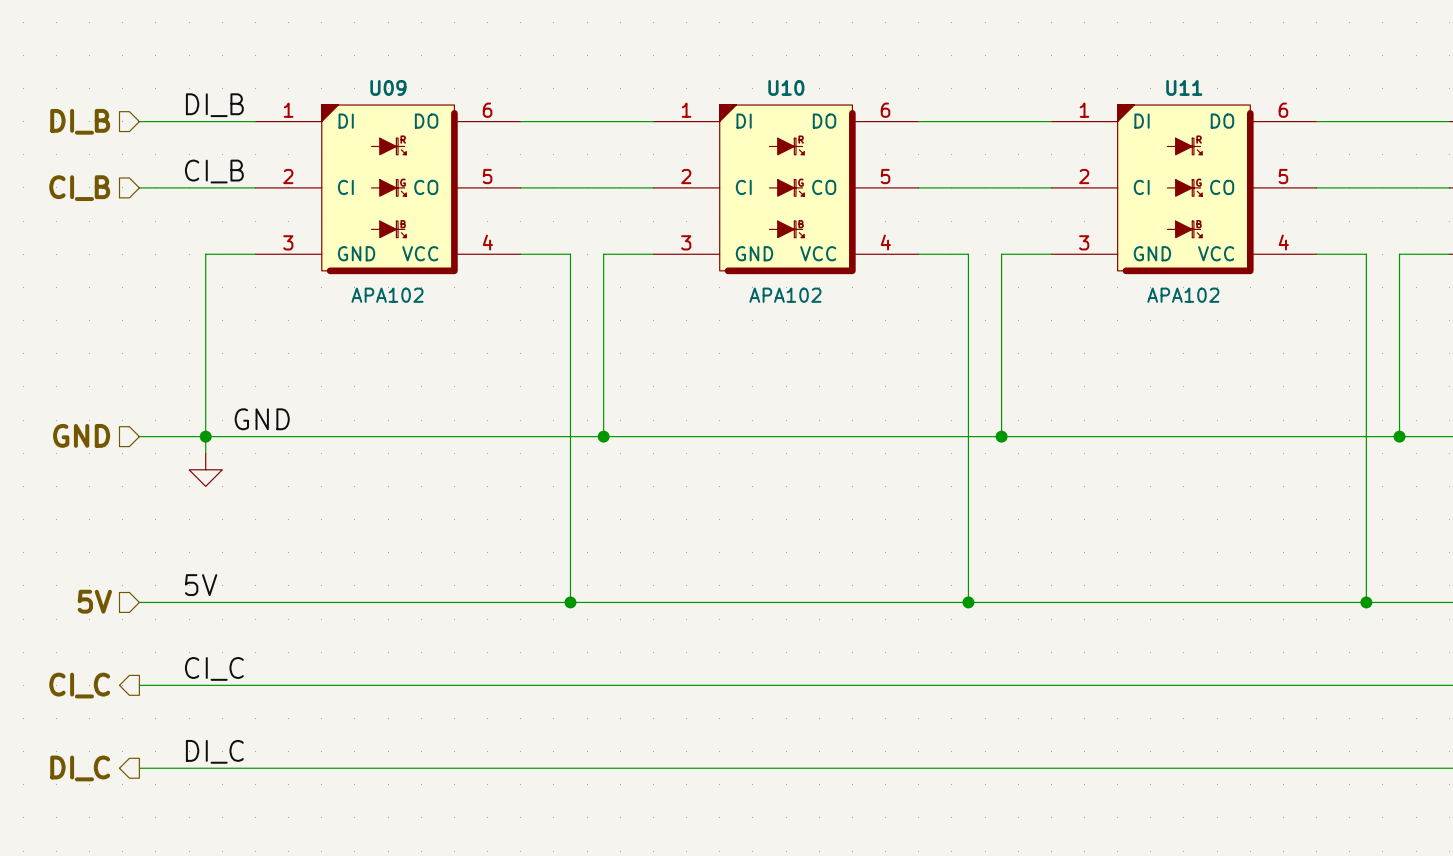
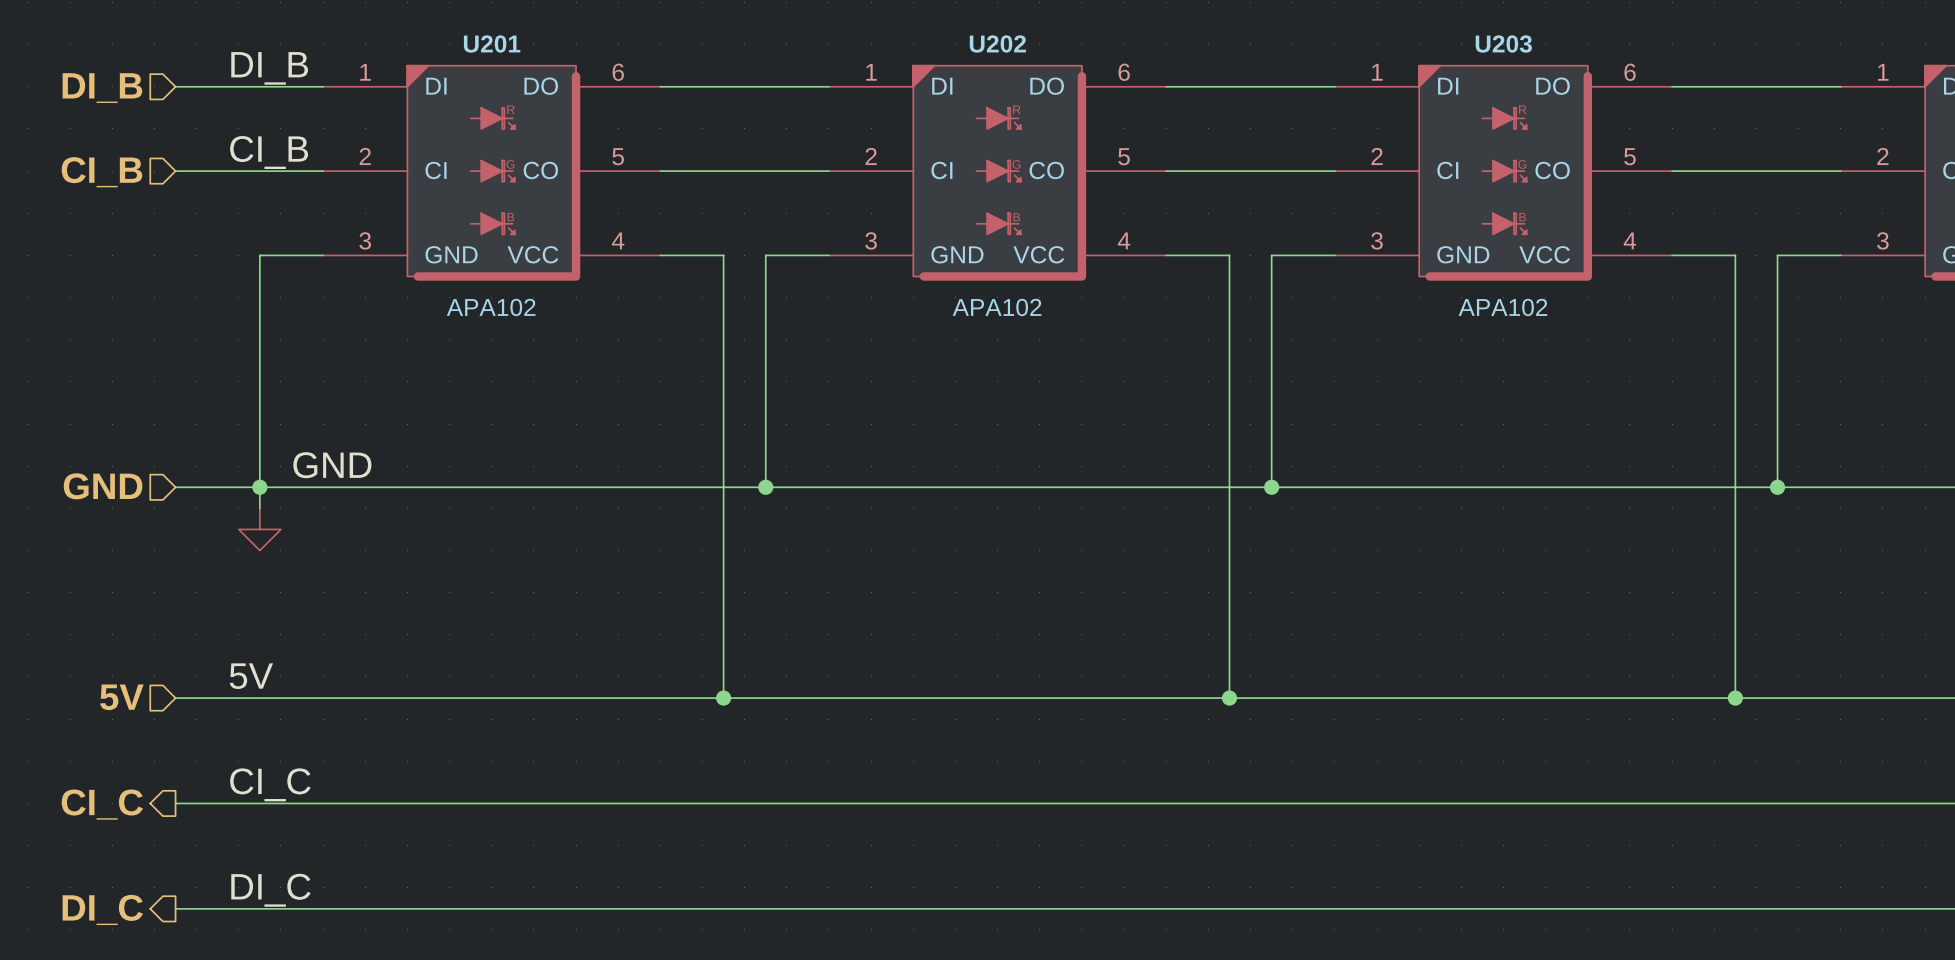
U09 name: U09 (388, 87) -> U201 (492, 43)
U10 name: U10 (786, 87) -> U202 (997, 43)
U11 name: U11 (1184, 87) -> U203 (1503, 44)

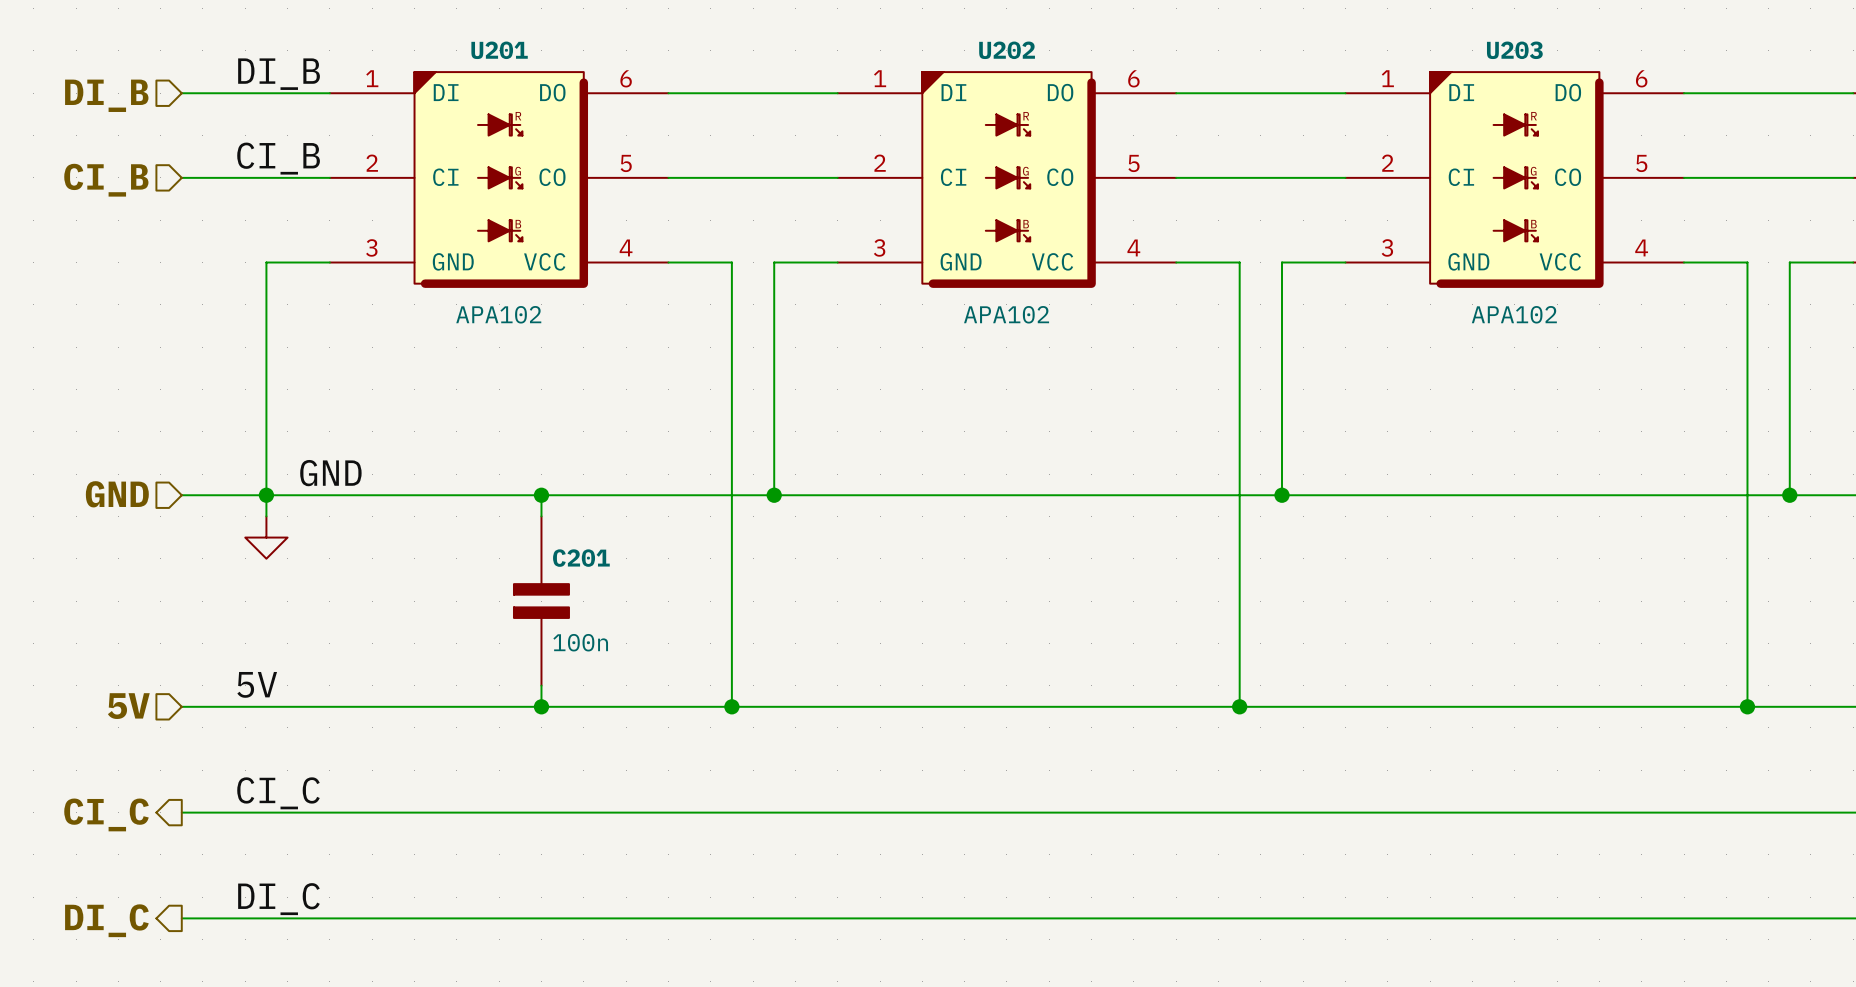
wire: none -> (541, 495) (541, 516)
junction: none -> (541, 495)
C201: none -> 100n (541, 601)
wire: none -> (541, 685) (541, 706)
junction: none -> (541, 706)

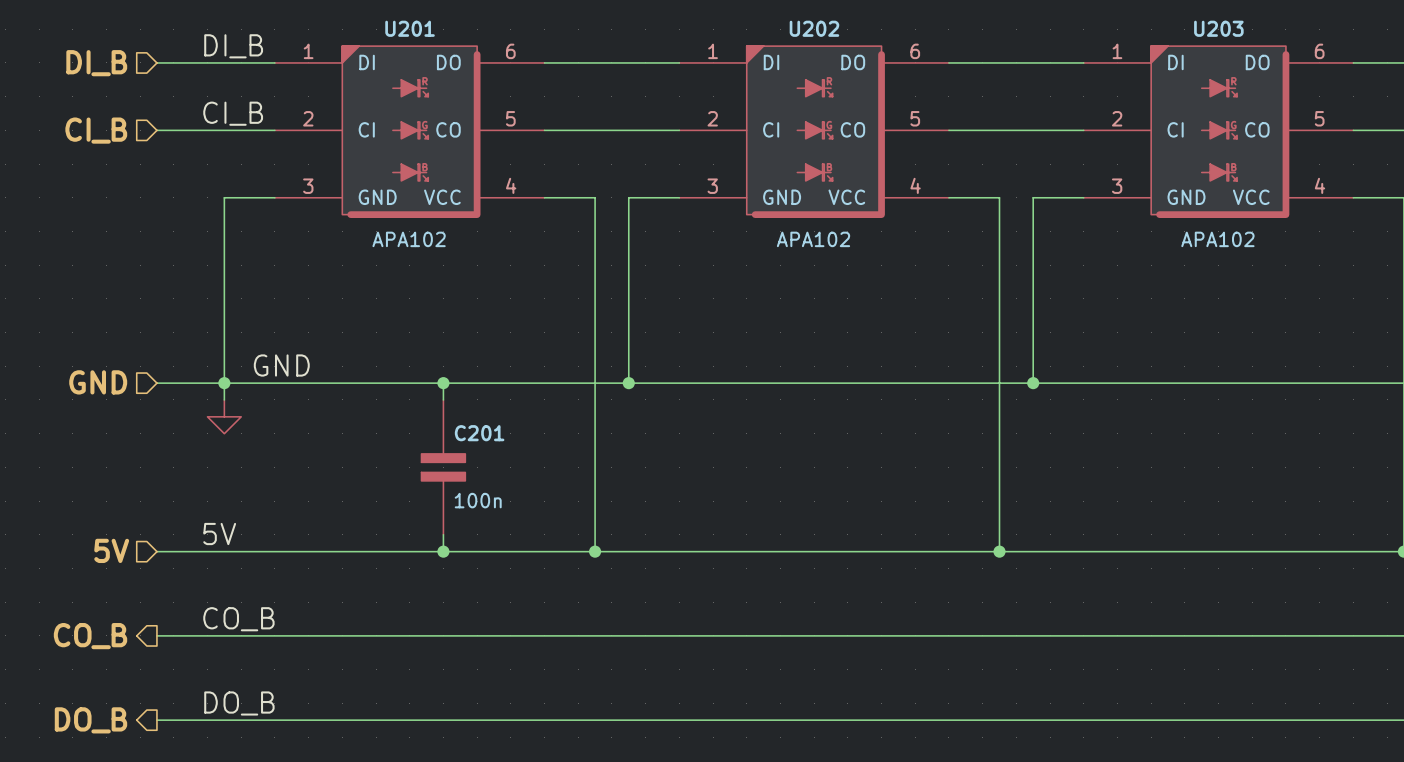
label: CI_C (278, 793) -> CO_B (238, 619)
hierarchical label: CI_C (106, 814) -> CO_B (90, 636)
label: DI_C (278, 899) -> DO_B (239, 703)
hierarchical label: DI_C (106, 920) -> DO_B (90, 720)

